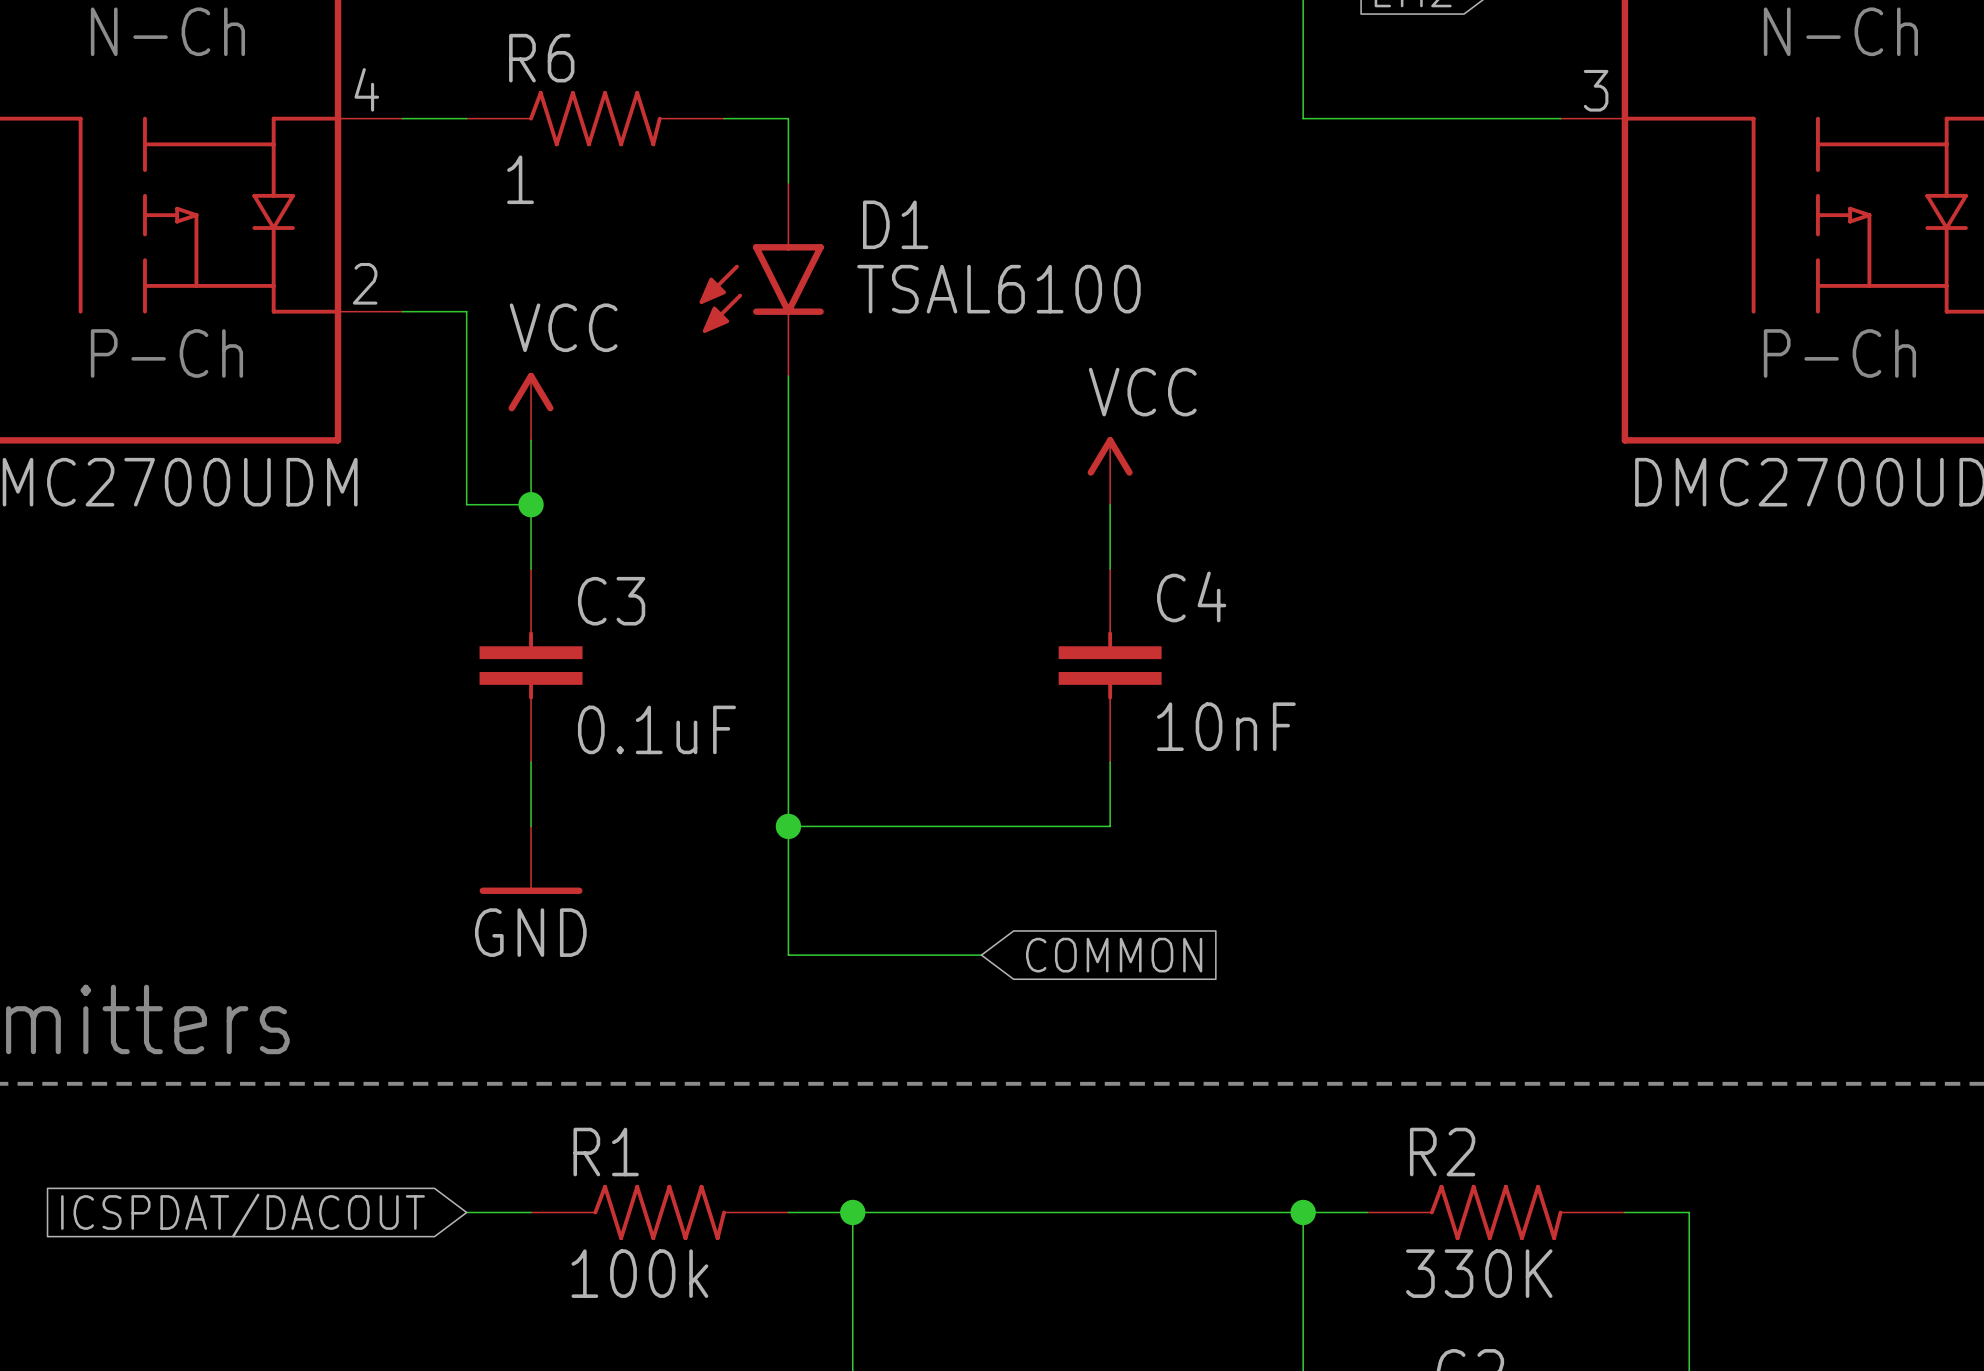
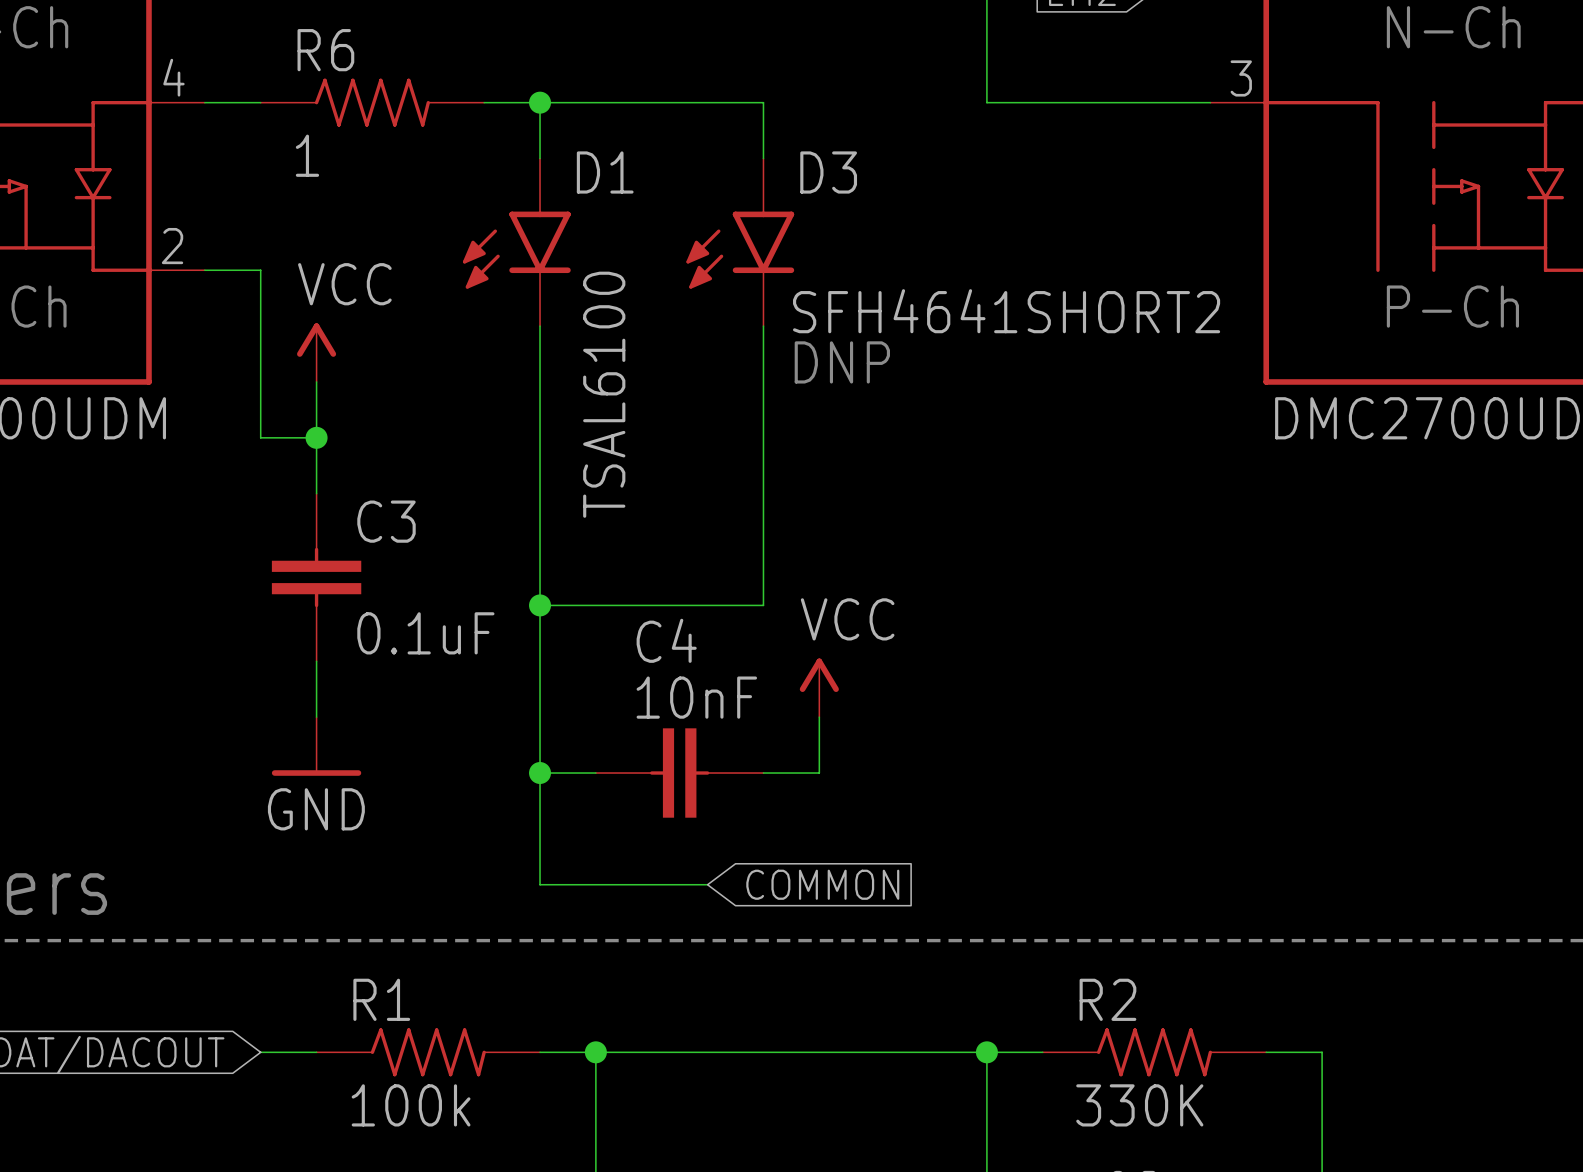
wire: none -> (540, 102) (763, 102) (763, 158)
junction: none -> (540, 102)
D1 name position: D1 (895, 224) -> D1 (605, 172)
D3: none -> SFH4641SHORT2 (740, 242)
D1 text rotation: 0° (998, 289) -> 90° counterclockwise (604, 394)
wire: none -> (763, 326) (763, 605) (540, 605)
text: none -> DNP (842, 362)
power symbol position: VCC (1110, 470) -> VCC (819, 687)
wire: (1110, 504) (1110, 569) -> none
C4 name position: C4 (1191, 596) -> C4 (666, 640)
C4 rotation: 0° (1110, 665) -> 90° clockwise (679, 773)
C4 position: (1110, 665) -> (679, 773)
junction: none -> (540, 605)
C4 value position: 10nF (1226, 726) -> 10nF (696, 697)
wire: (1110, 762) (1110, 826) (788, 826) -> none
junction: (788, 826) -> none
wire: none -> (819, 717) (819, 773) (763, 773)
wire: none -> (540, 773) (595, 773)
junction: none -> (540, 773)
wire: (788, 955) (981, 955) -> (540, 828) (540, 884) (707, 884)
global label position: COMMON (1114, 955) -> COMMON (822, 884)

